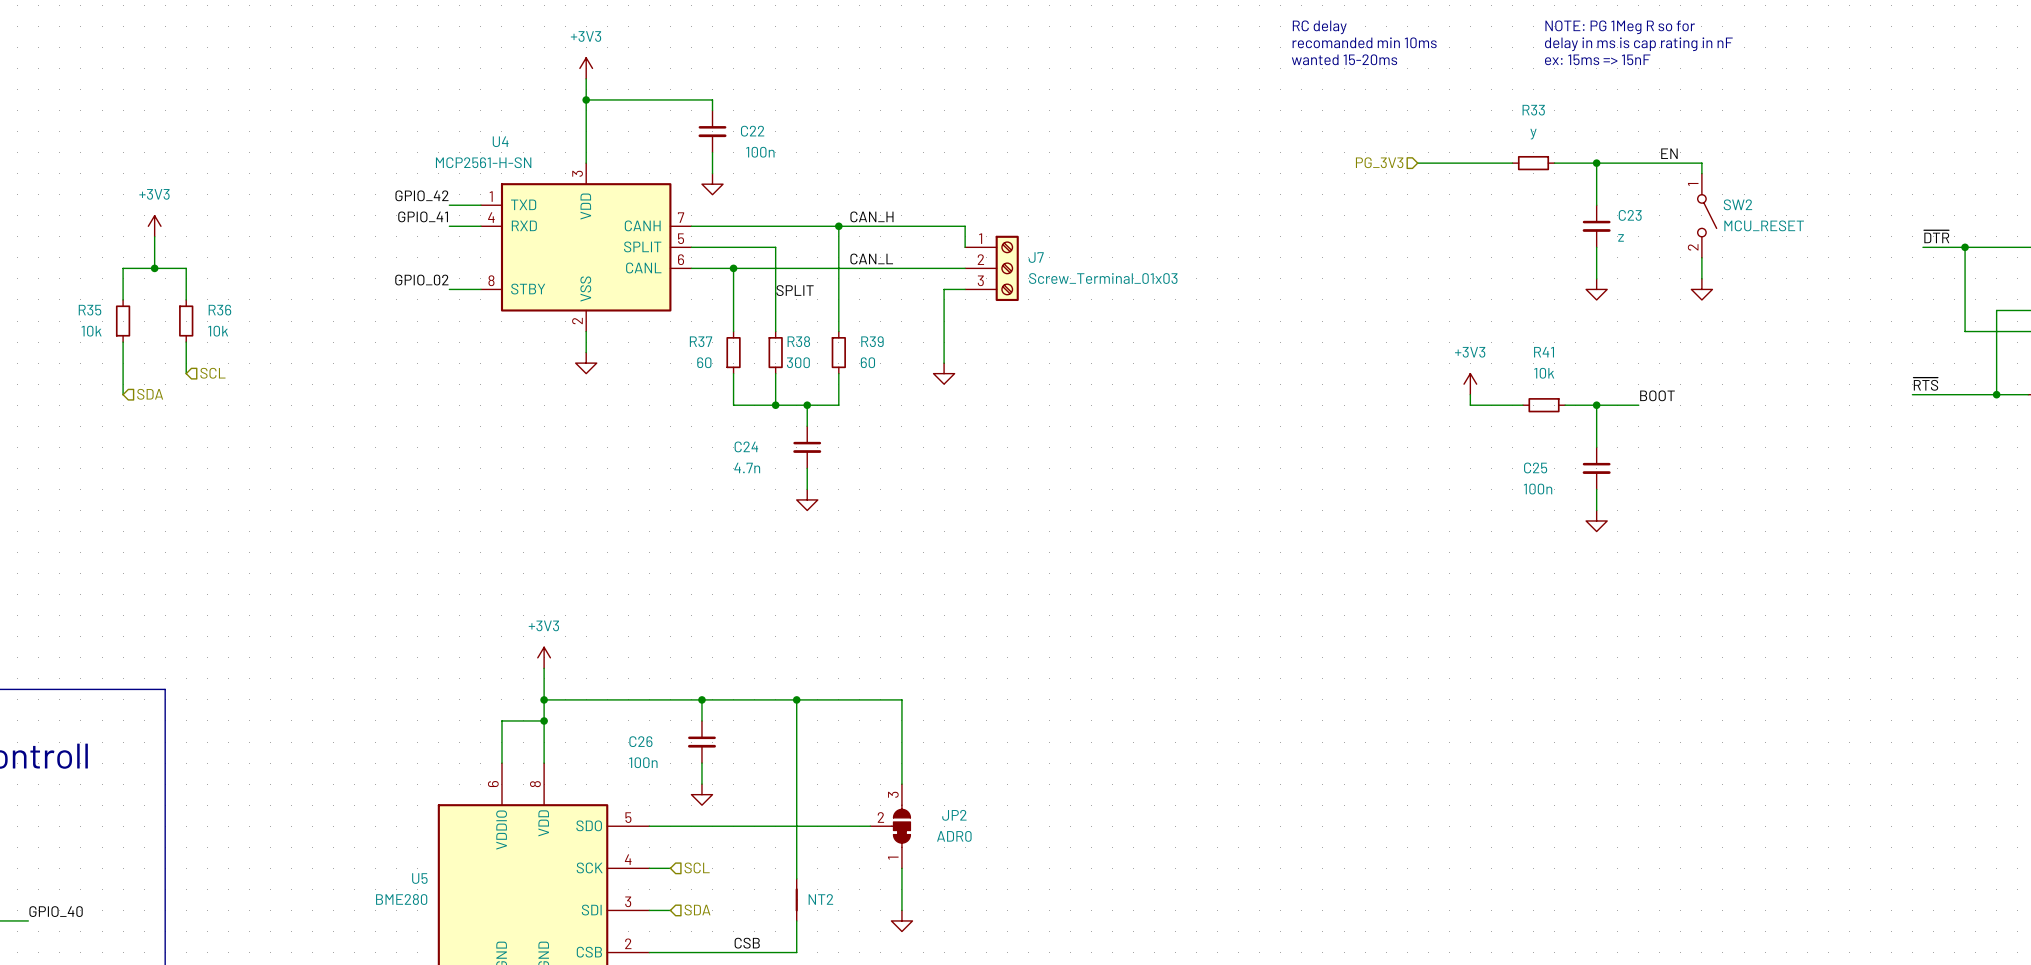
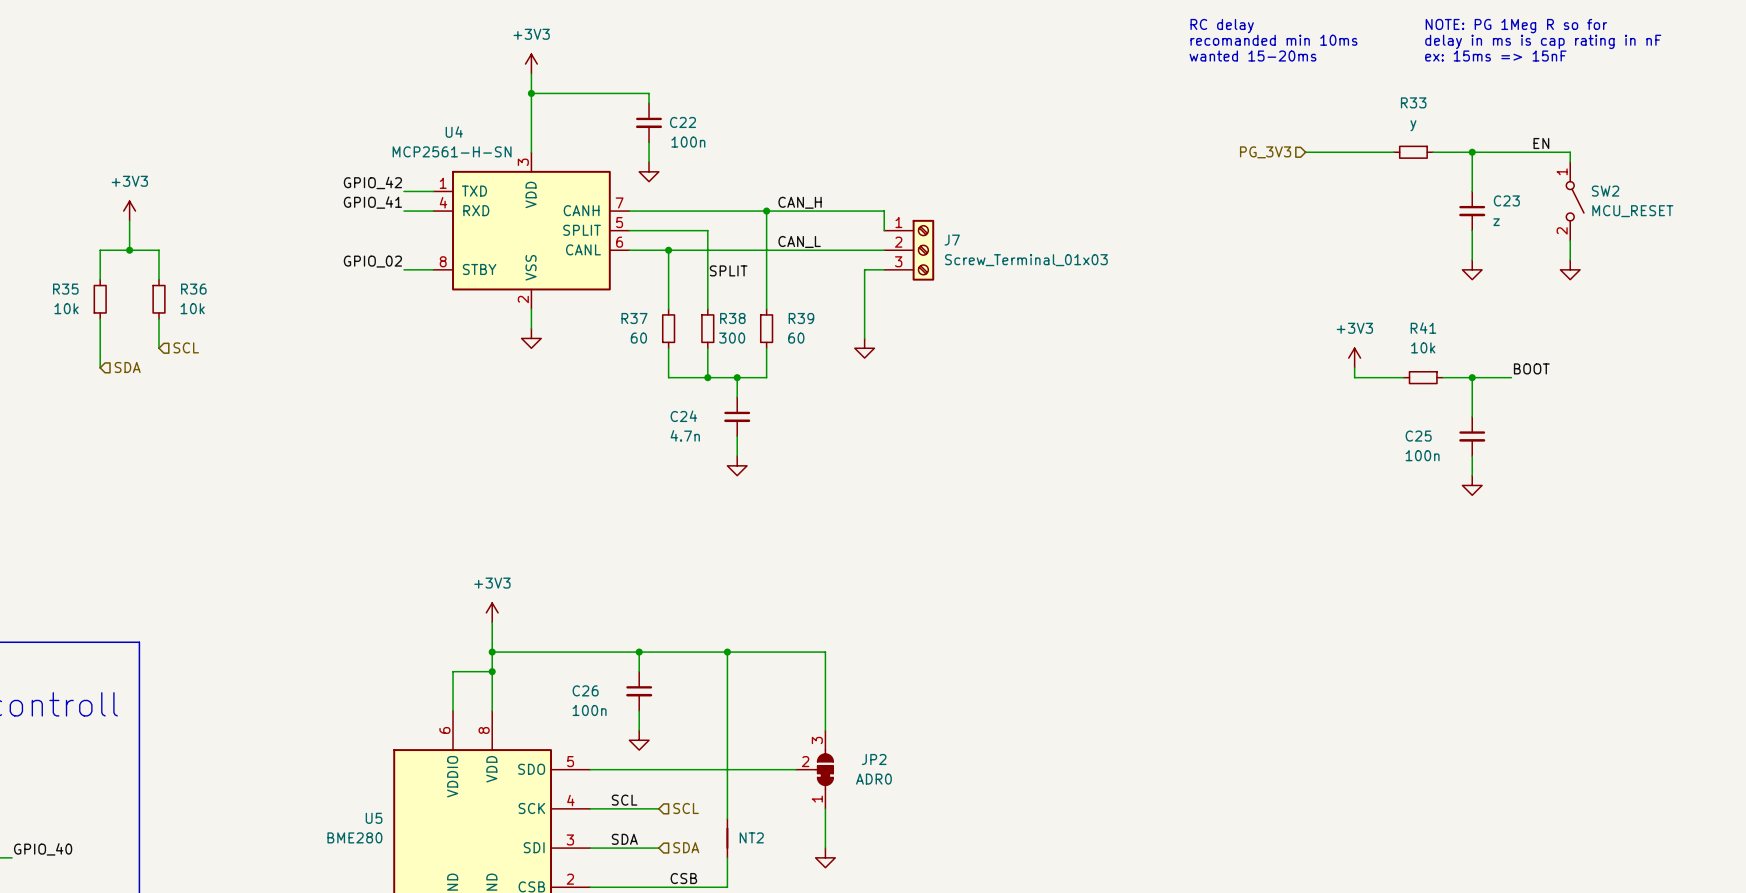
label: none -> SCL (624, 800)
hierarchical label position: SCL (697, 867) -> SCL (686, 808)
wire: none -> (609, 808) (658, 808)
label: none -> SDA (624, 839)
wire: none -> (609, 848) (658, 848)
hierarchical label position: SDA (697, 910) -> SDA (686, 847)

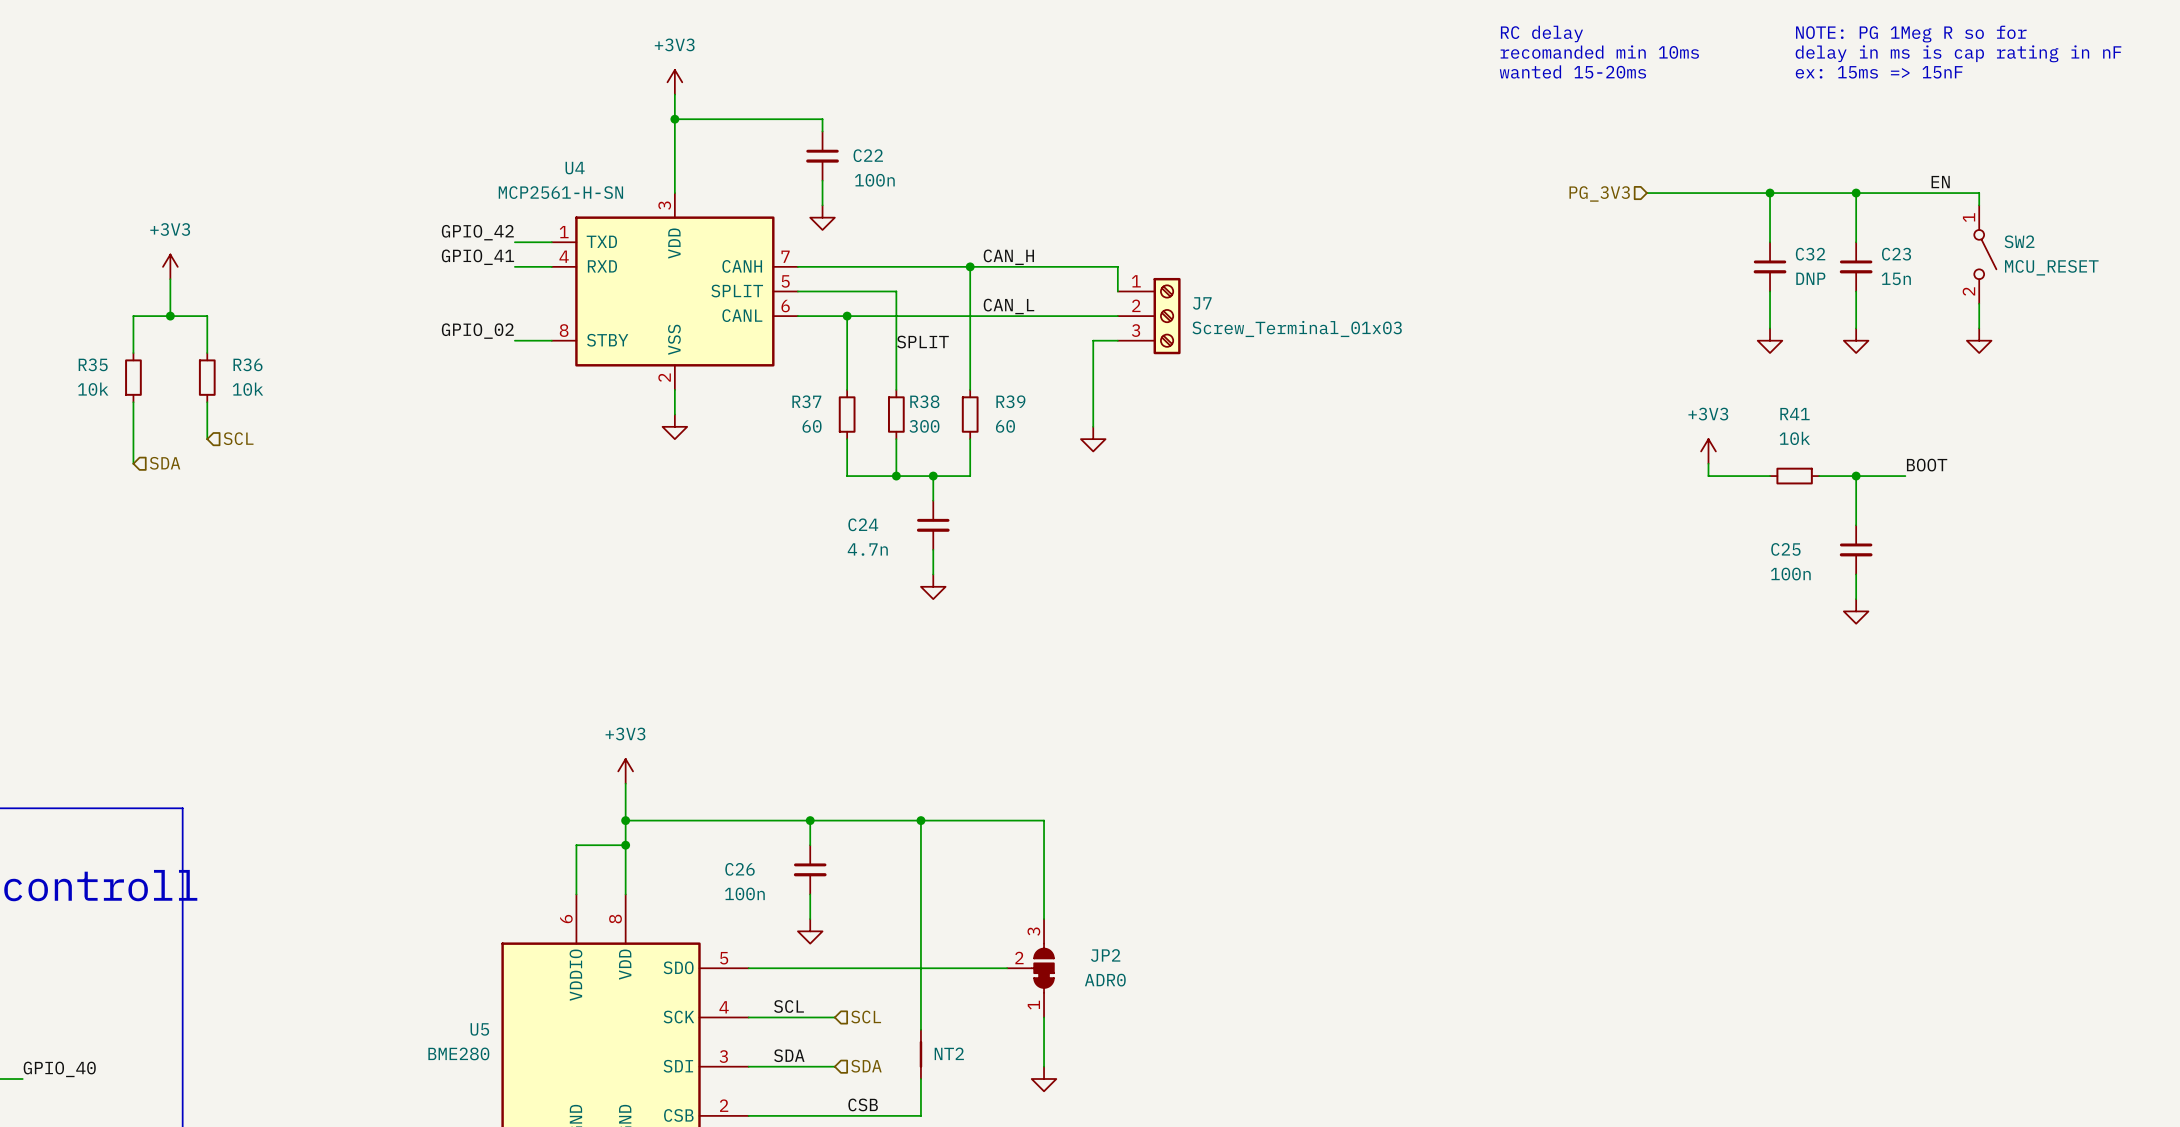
wire: none -> (1757, 193) (1806, 193)
wire: none -> (1770, 193) (1770, 242)
junction: none -> (1770, 193)
R33: y (1413, 152) -> none
C32: none -> DNP (1770, 266)
C23 value: z (1496, 222) -> 15n (1896, 278)
wire: none -> (1770, 291) (1770, 328)
power symbol: none -> (1770, 340)

